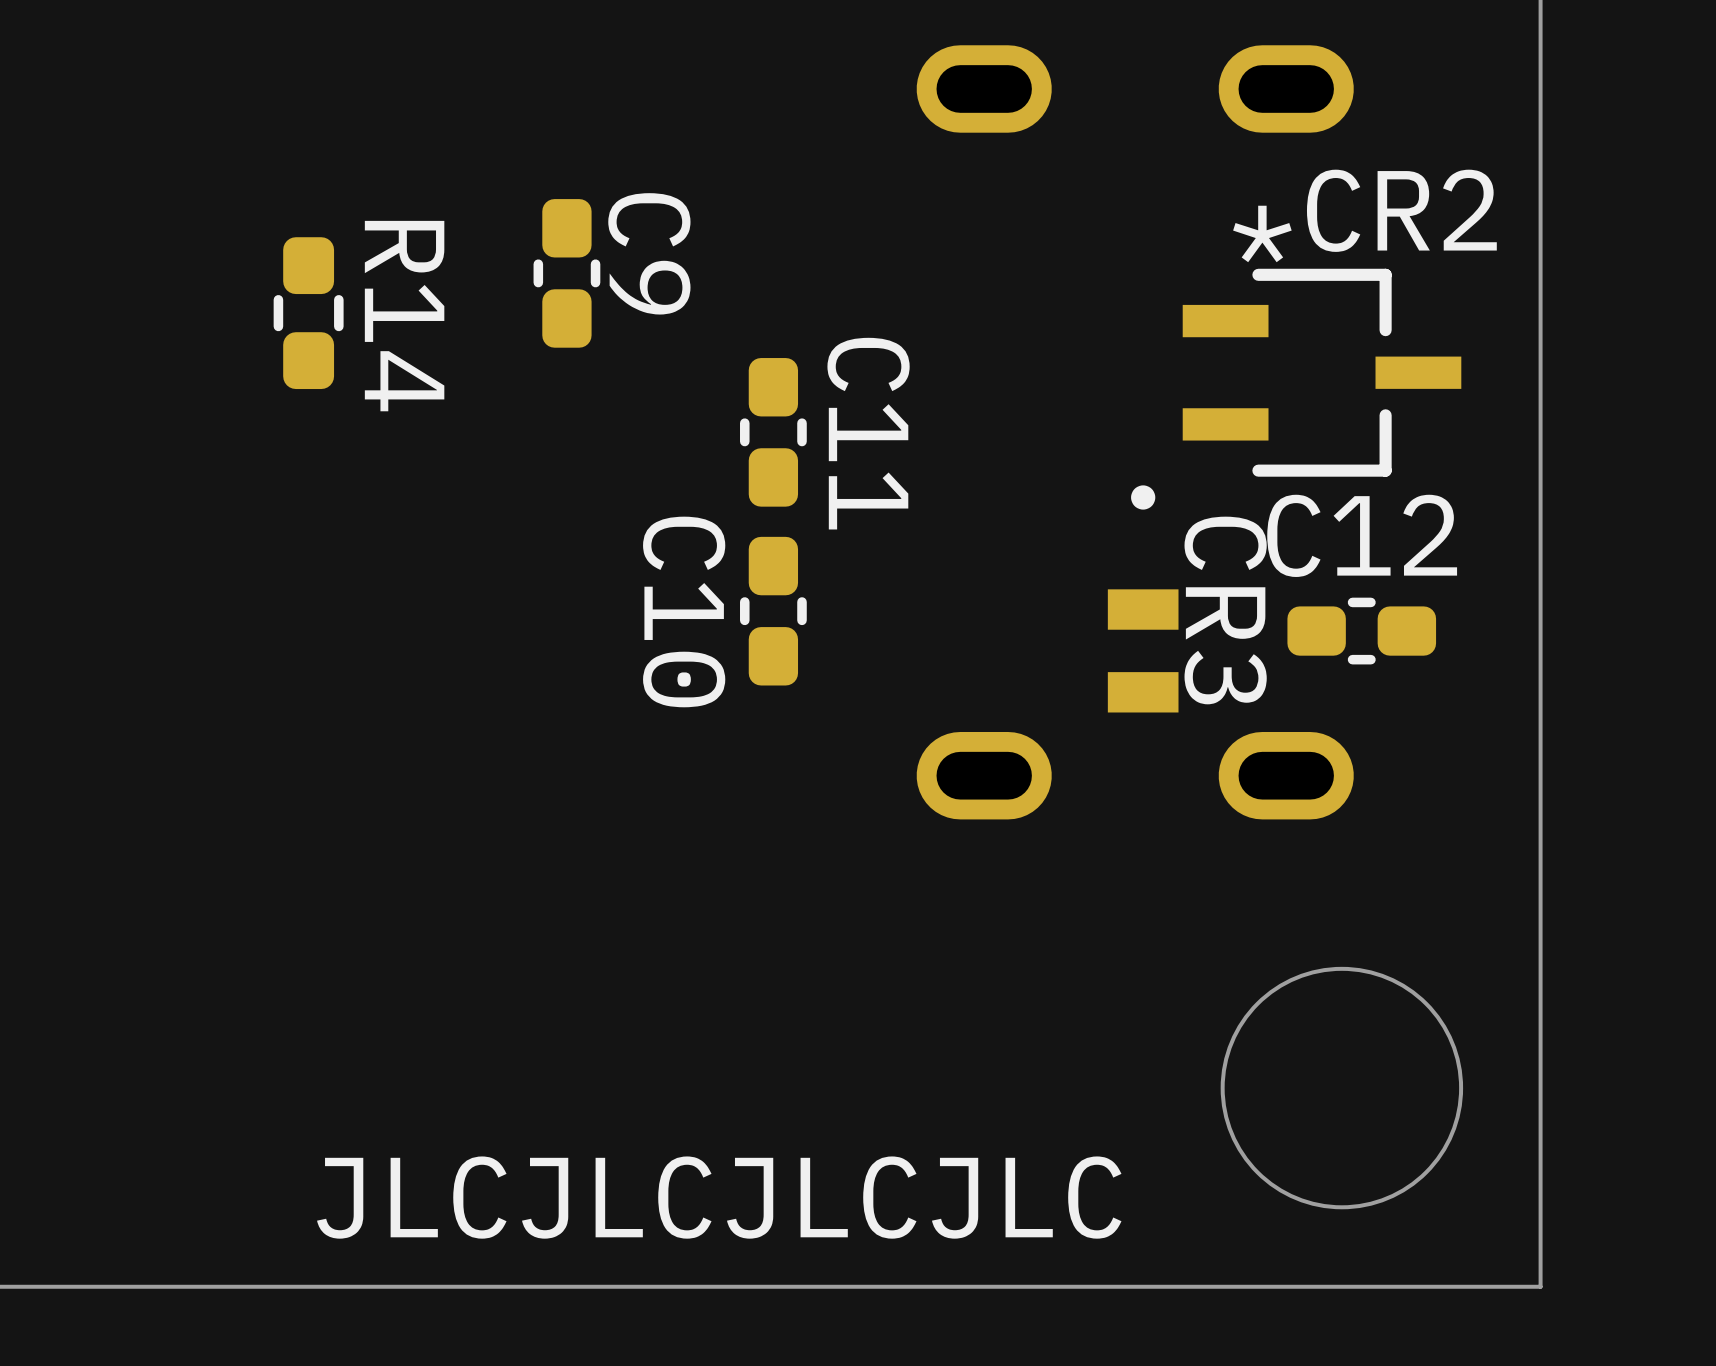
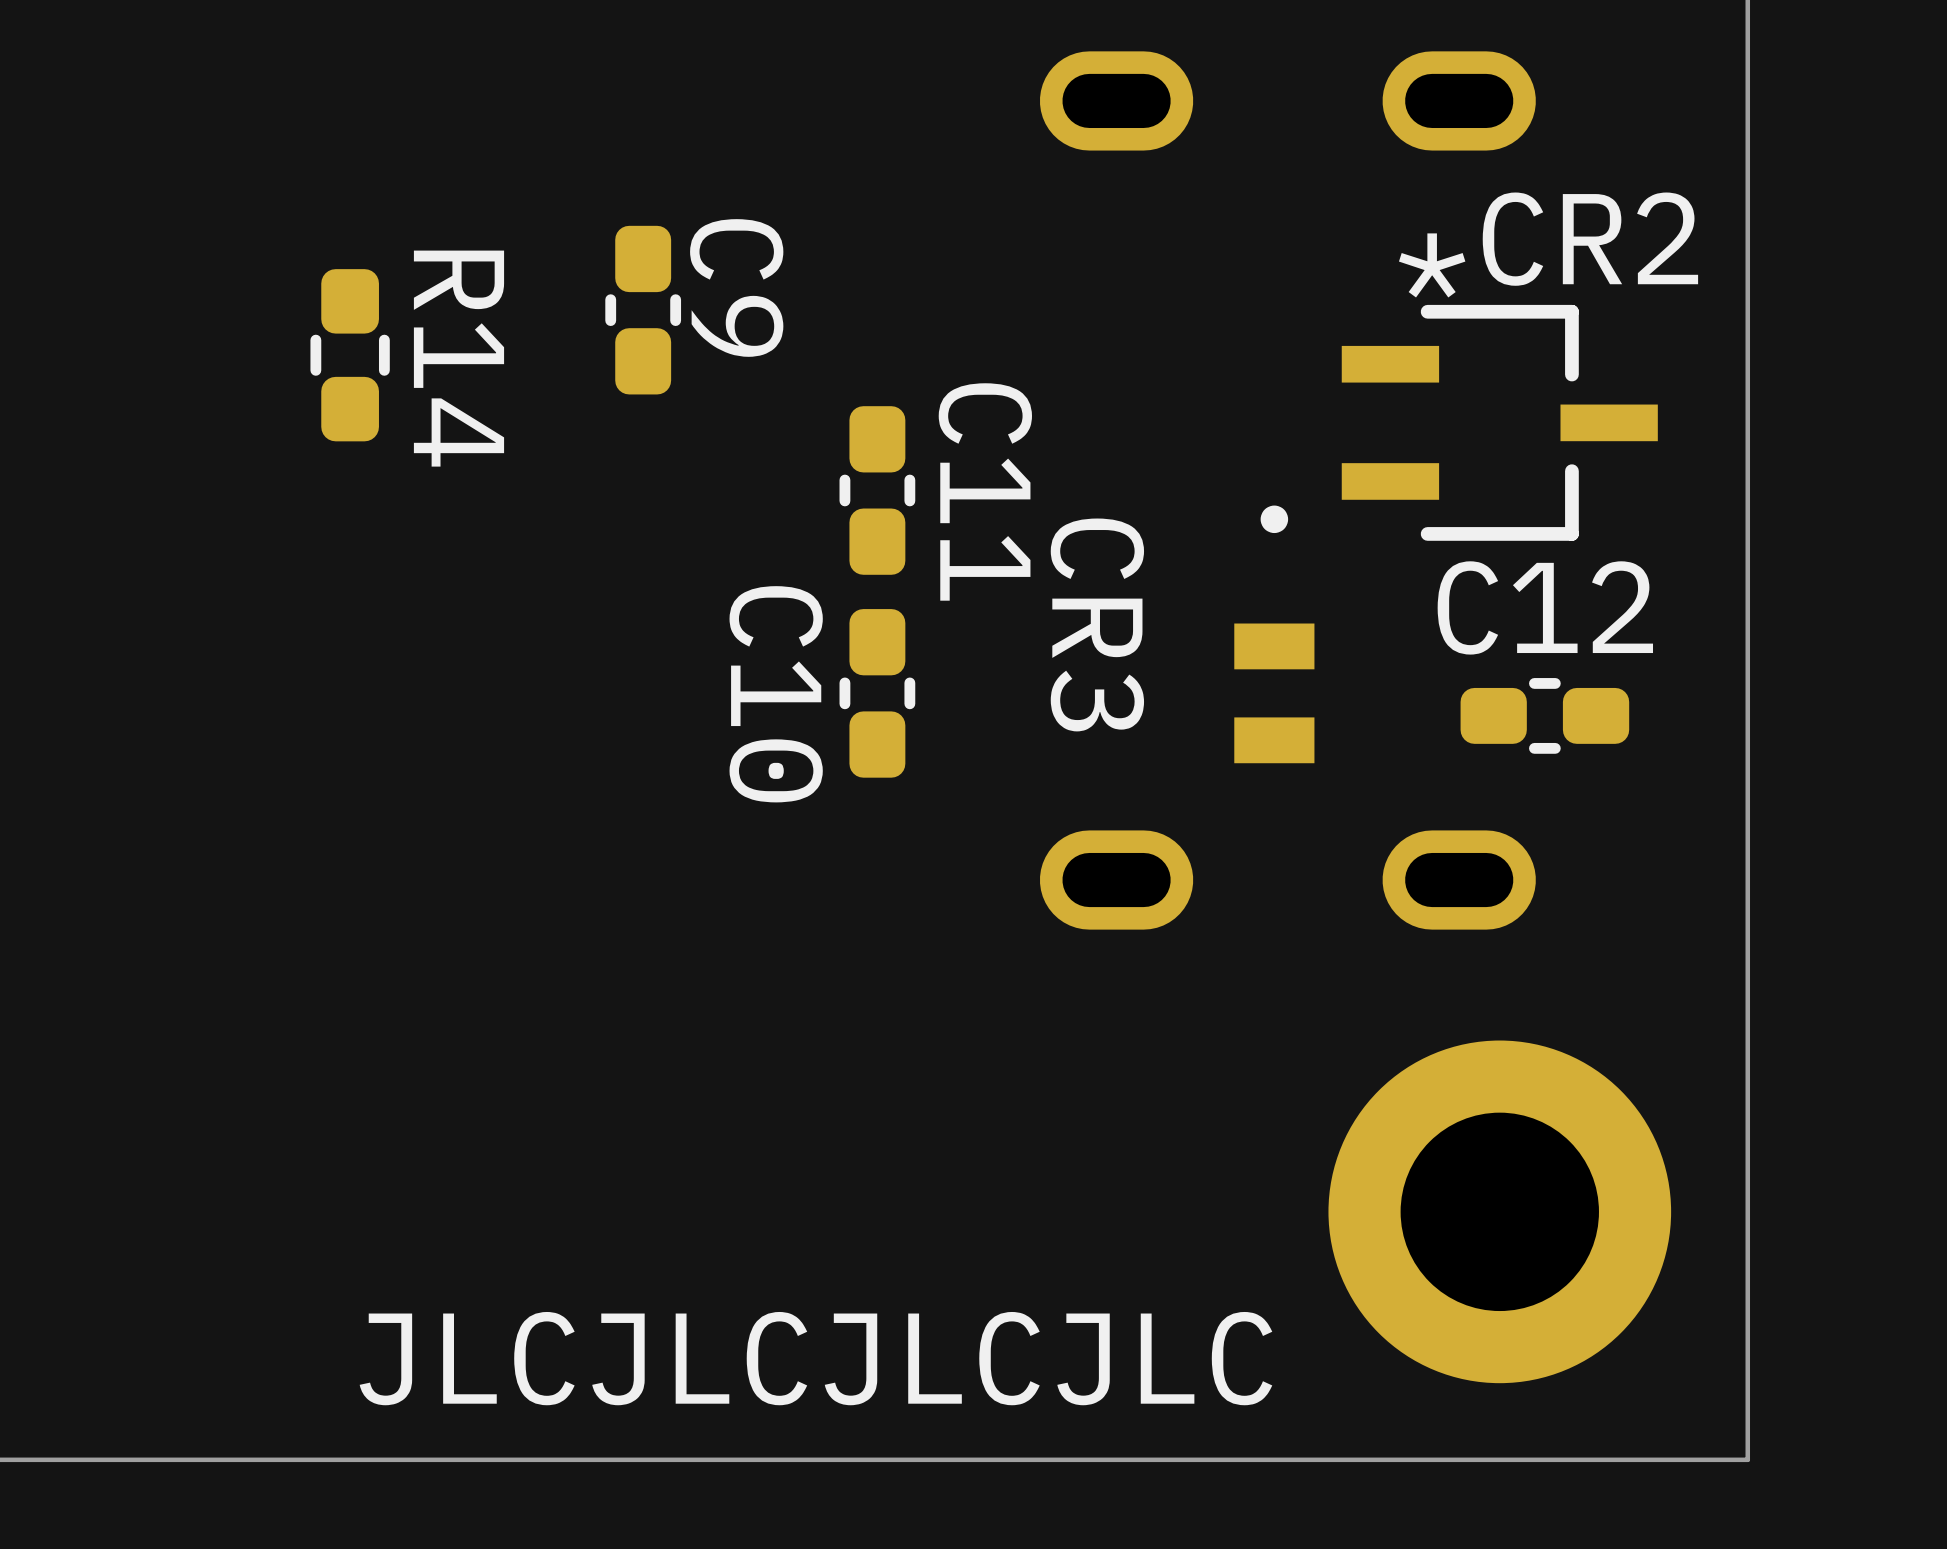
CR3 position: (1143, 598) -> (1274, 634)
CR3 name position: CR3 (1225, 610) -> CR3 (1097, 624)
round board edge: [1220, 966, 1464, 1210] -> none
part: none -> (1499, 1211)

